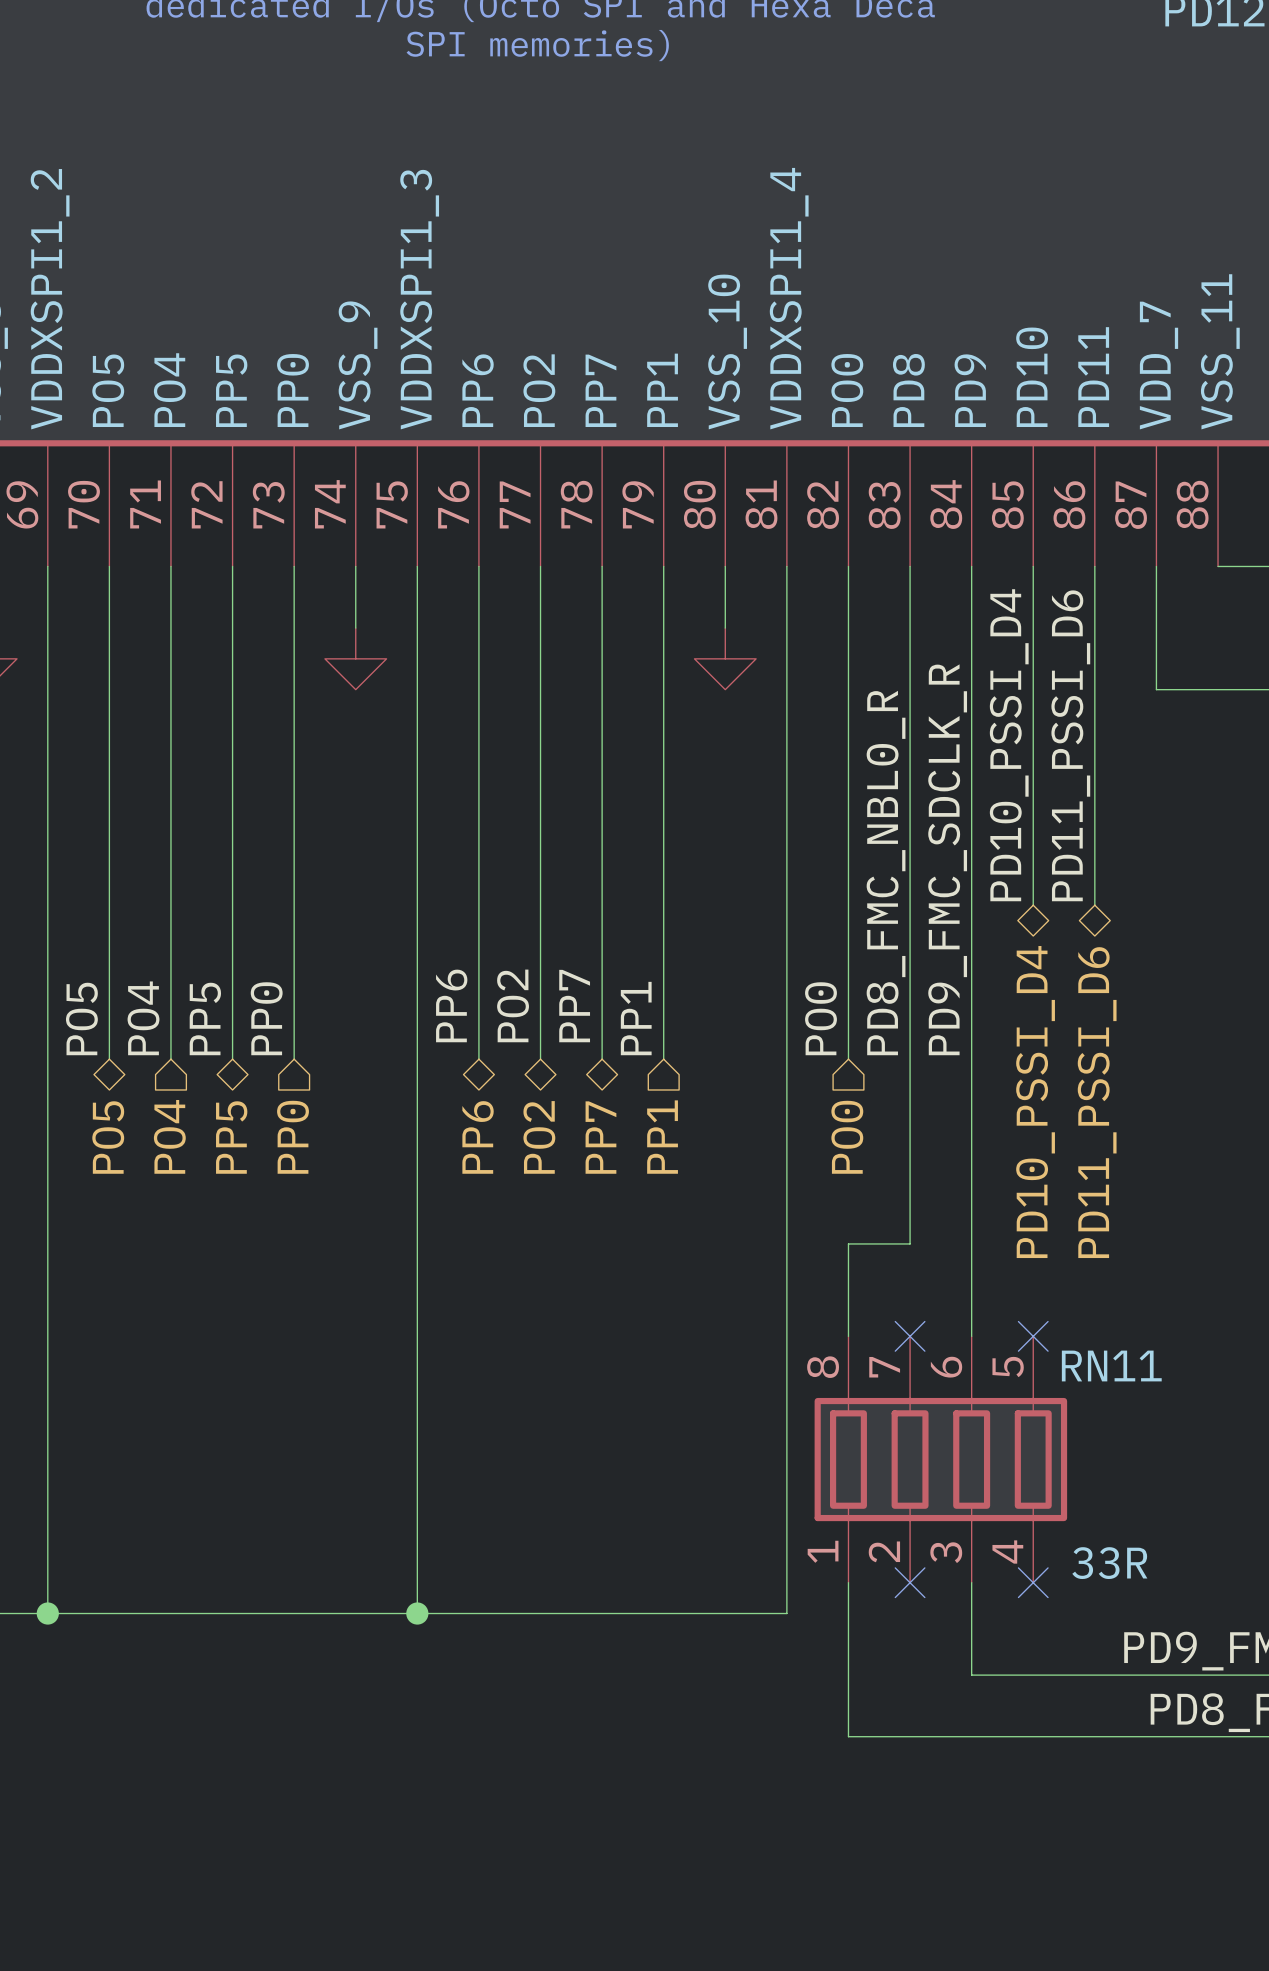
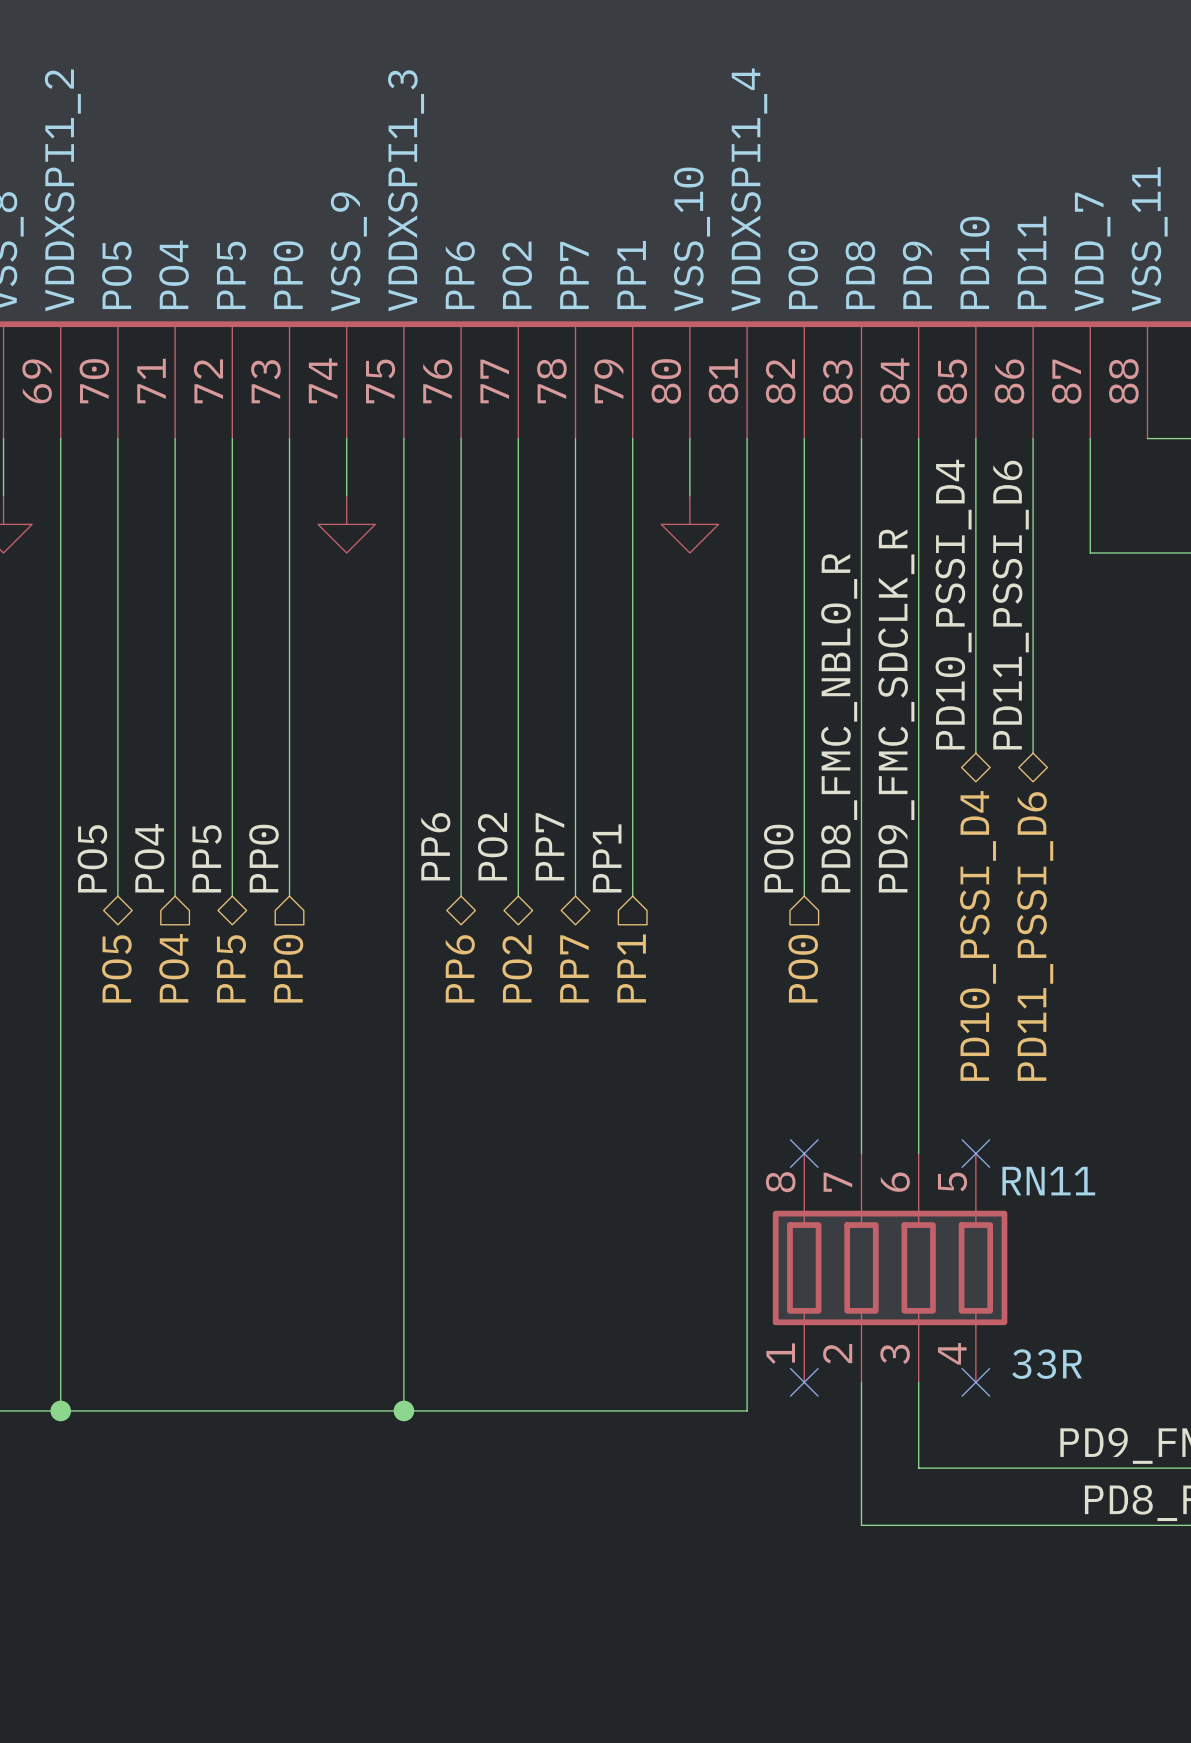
wire: (910, 1243) (848, 1243) (848, 1336) -> (861, 1067) (861, 1153)
no-connect mark position: (910, 1336) -> (804, 1153)
wire: (848, 1582) (848, 1736) (910, 1736) -> (861, 1382) (861, 1525)
no-connect mark position: (910, 1582) -> (804, 1382)

